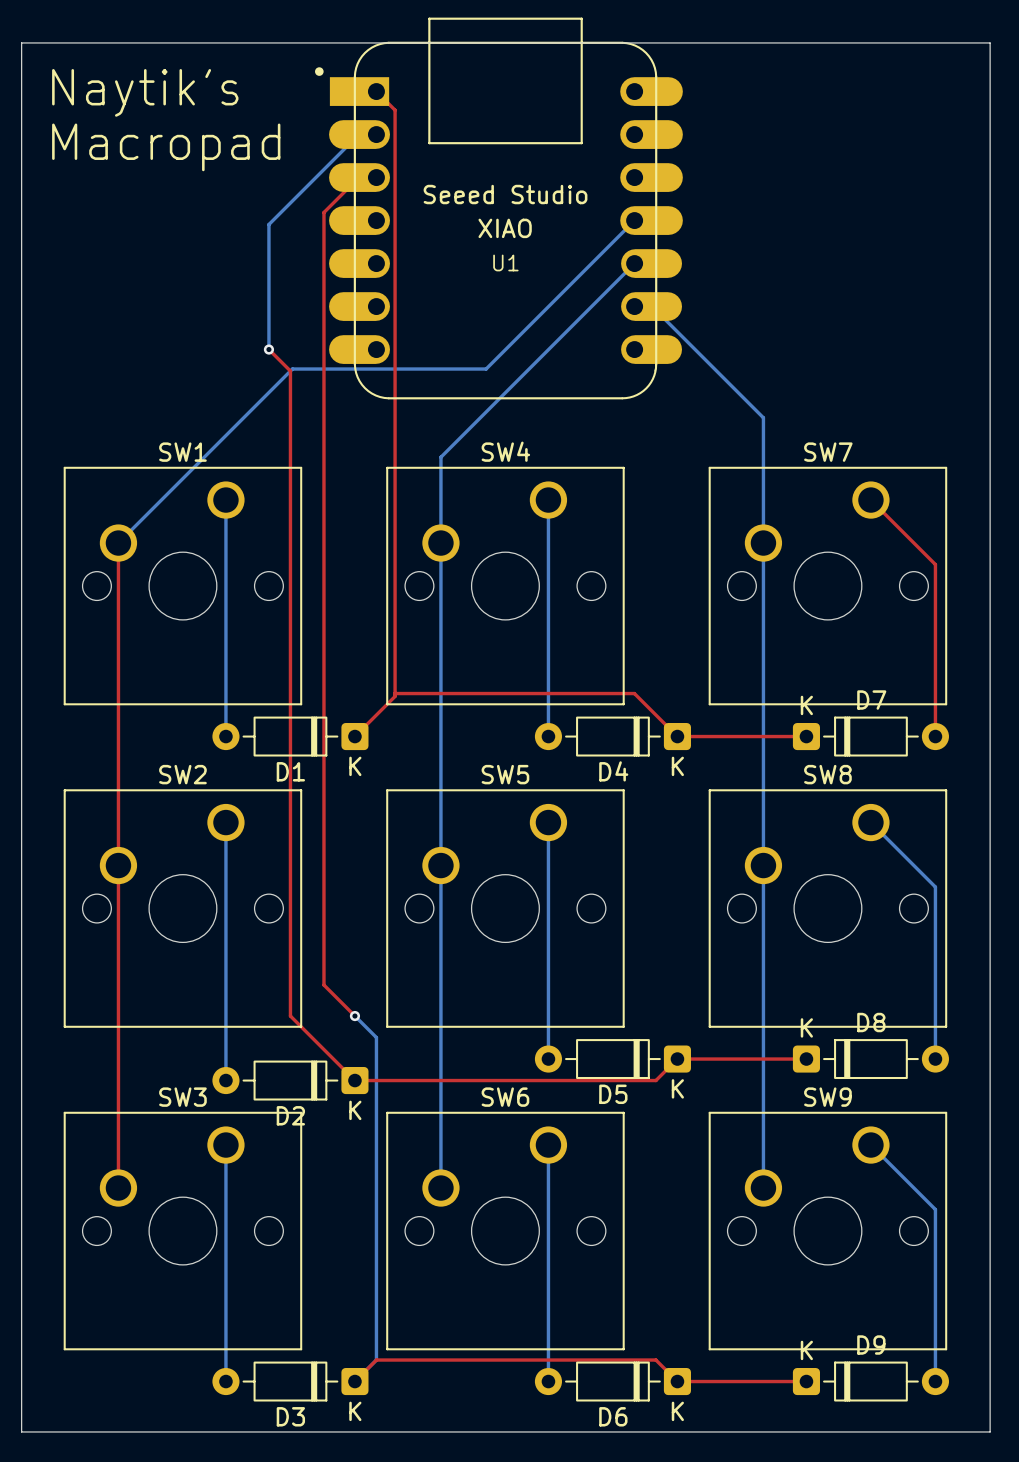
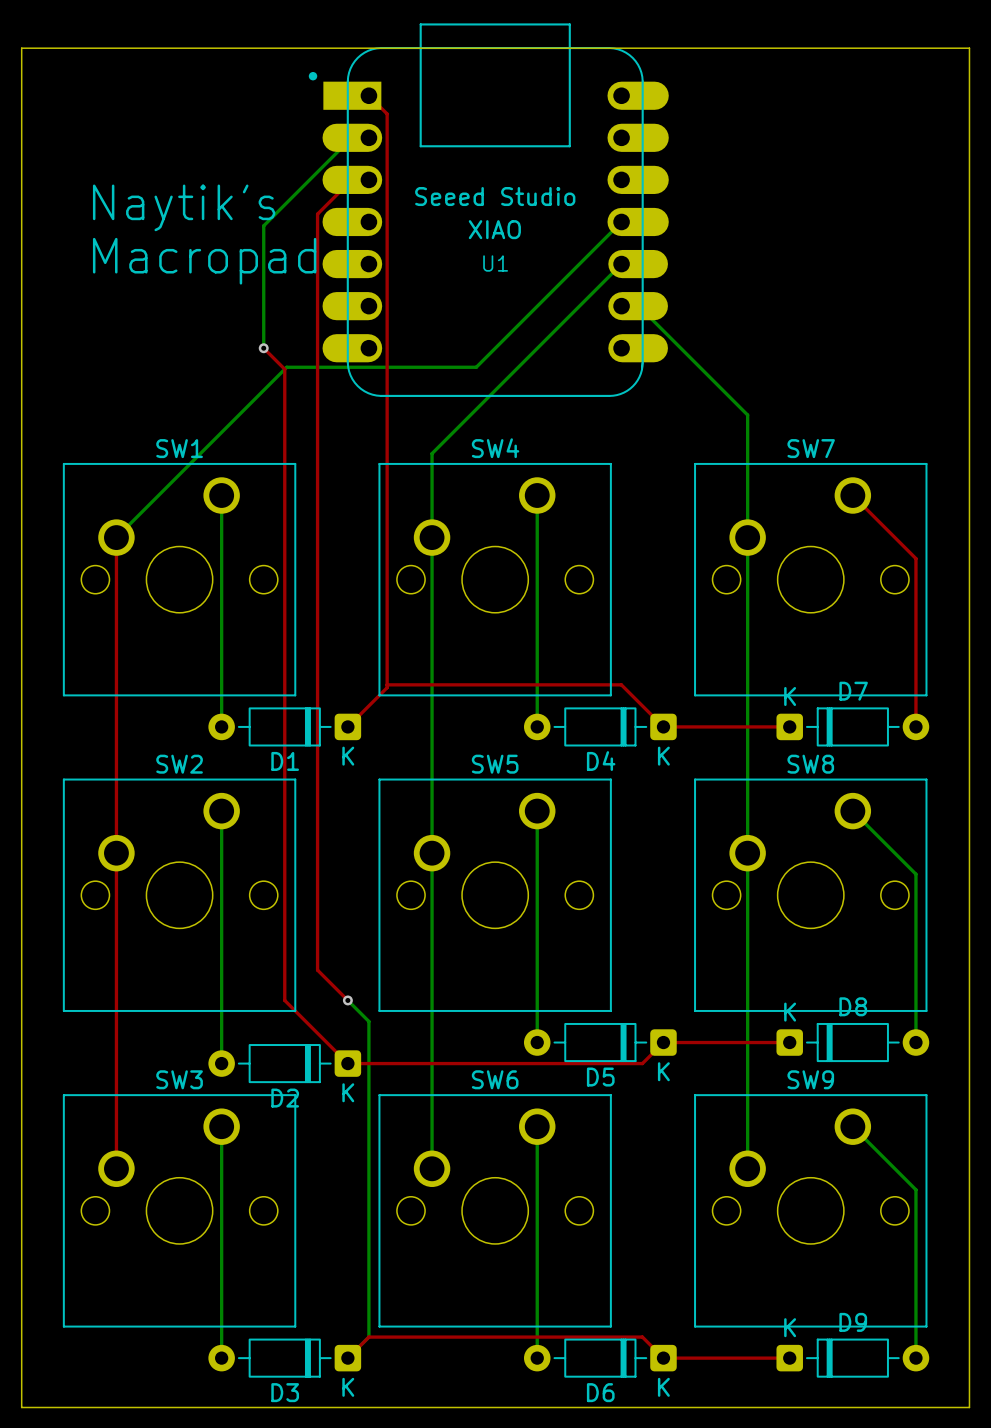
text position: Naytik's (145, 92) -> Naytik's (184, 207)
text position: Macropad (166, 147) -> Macropad (204, 261)

